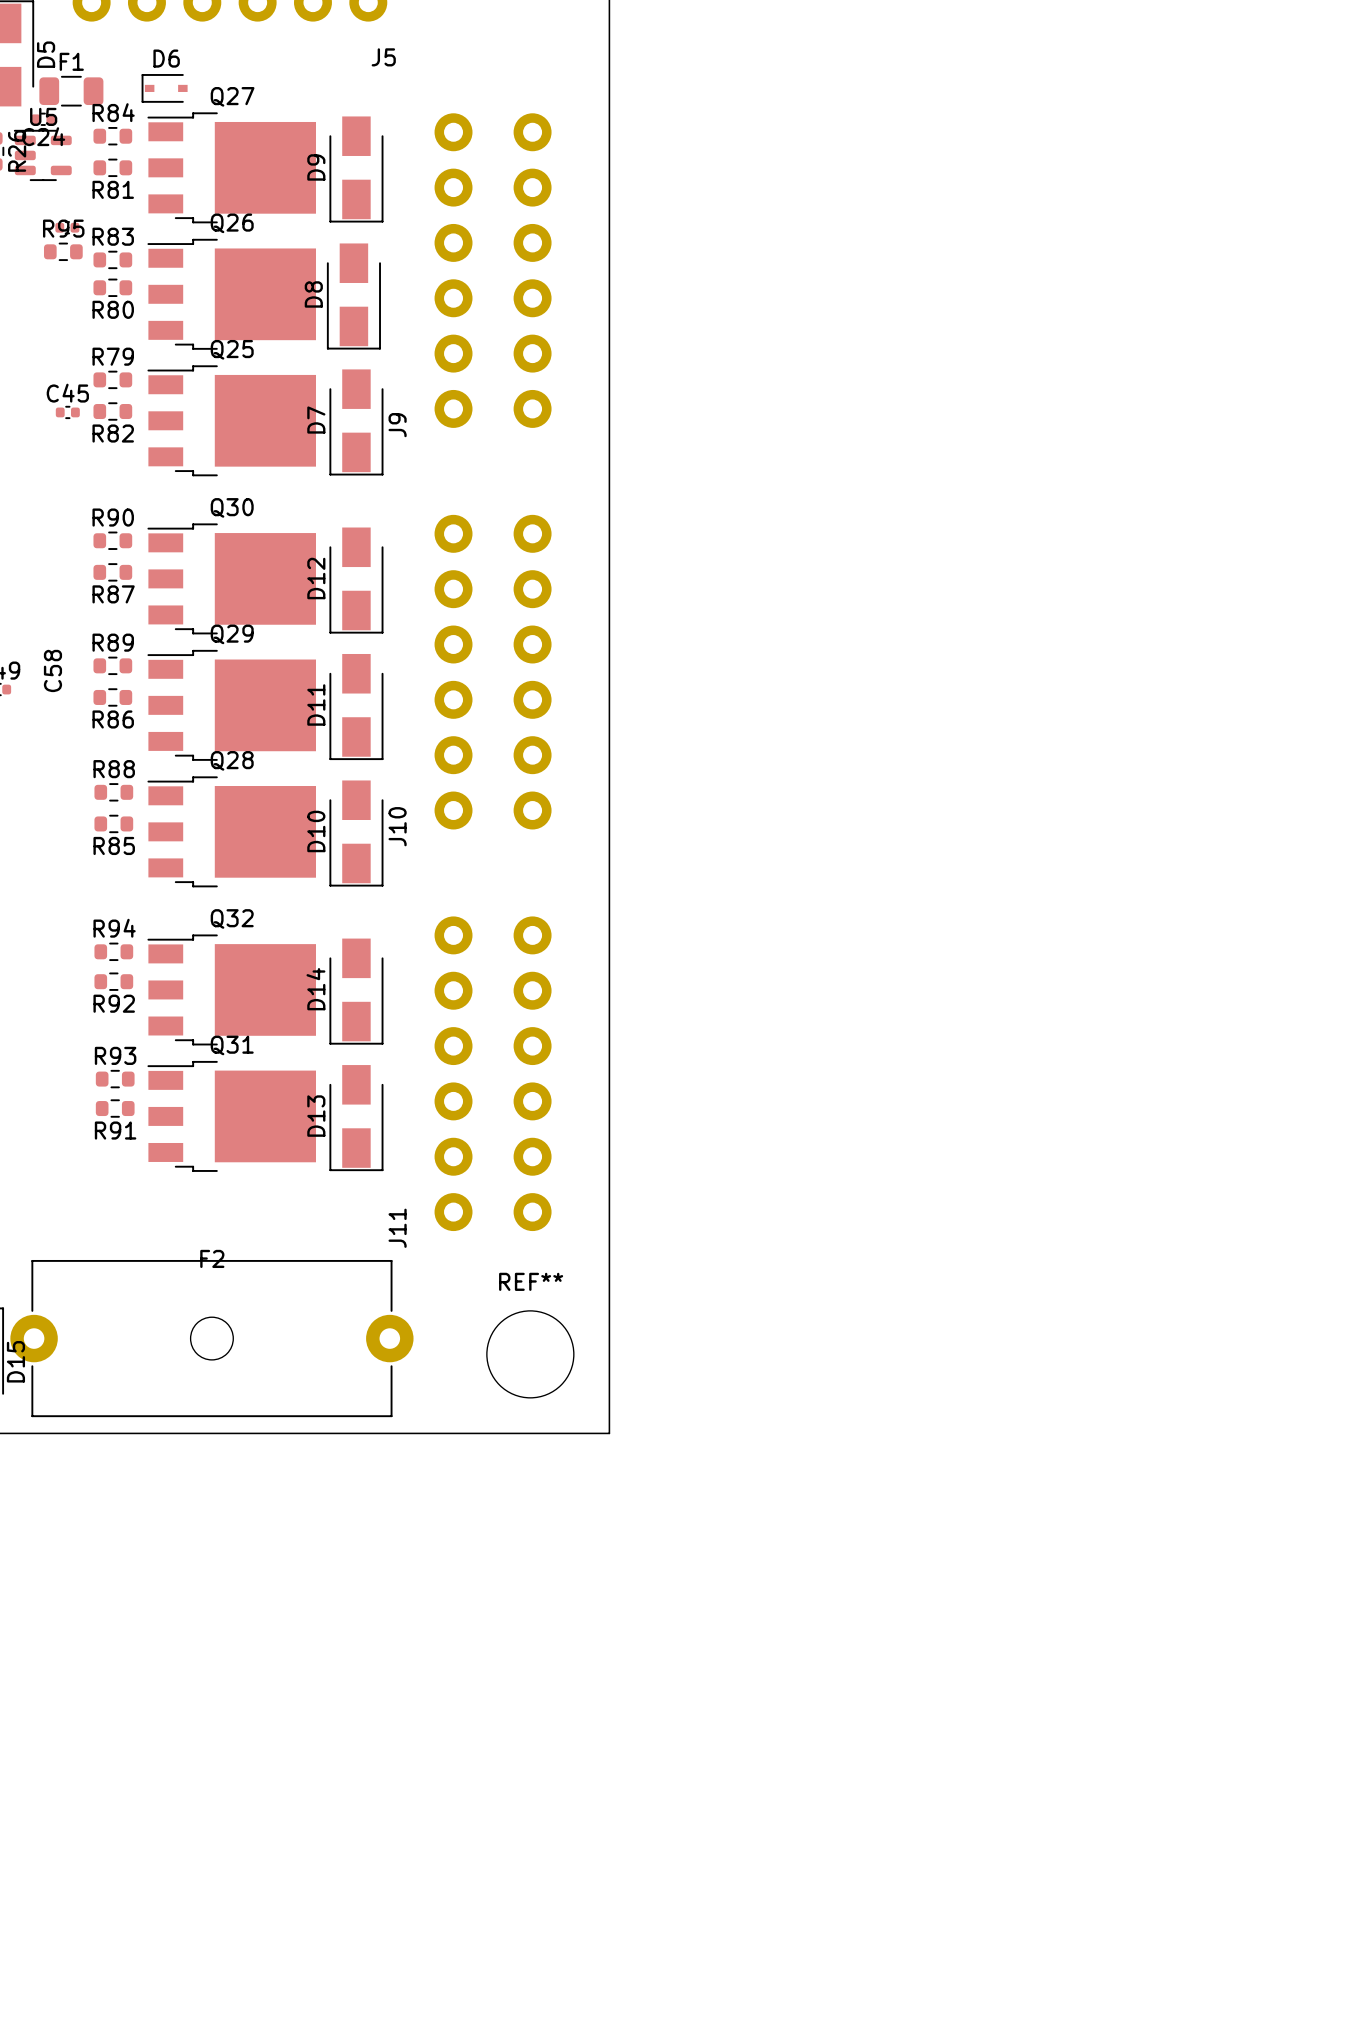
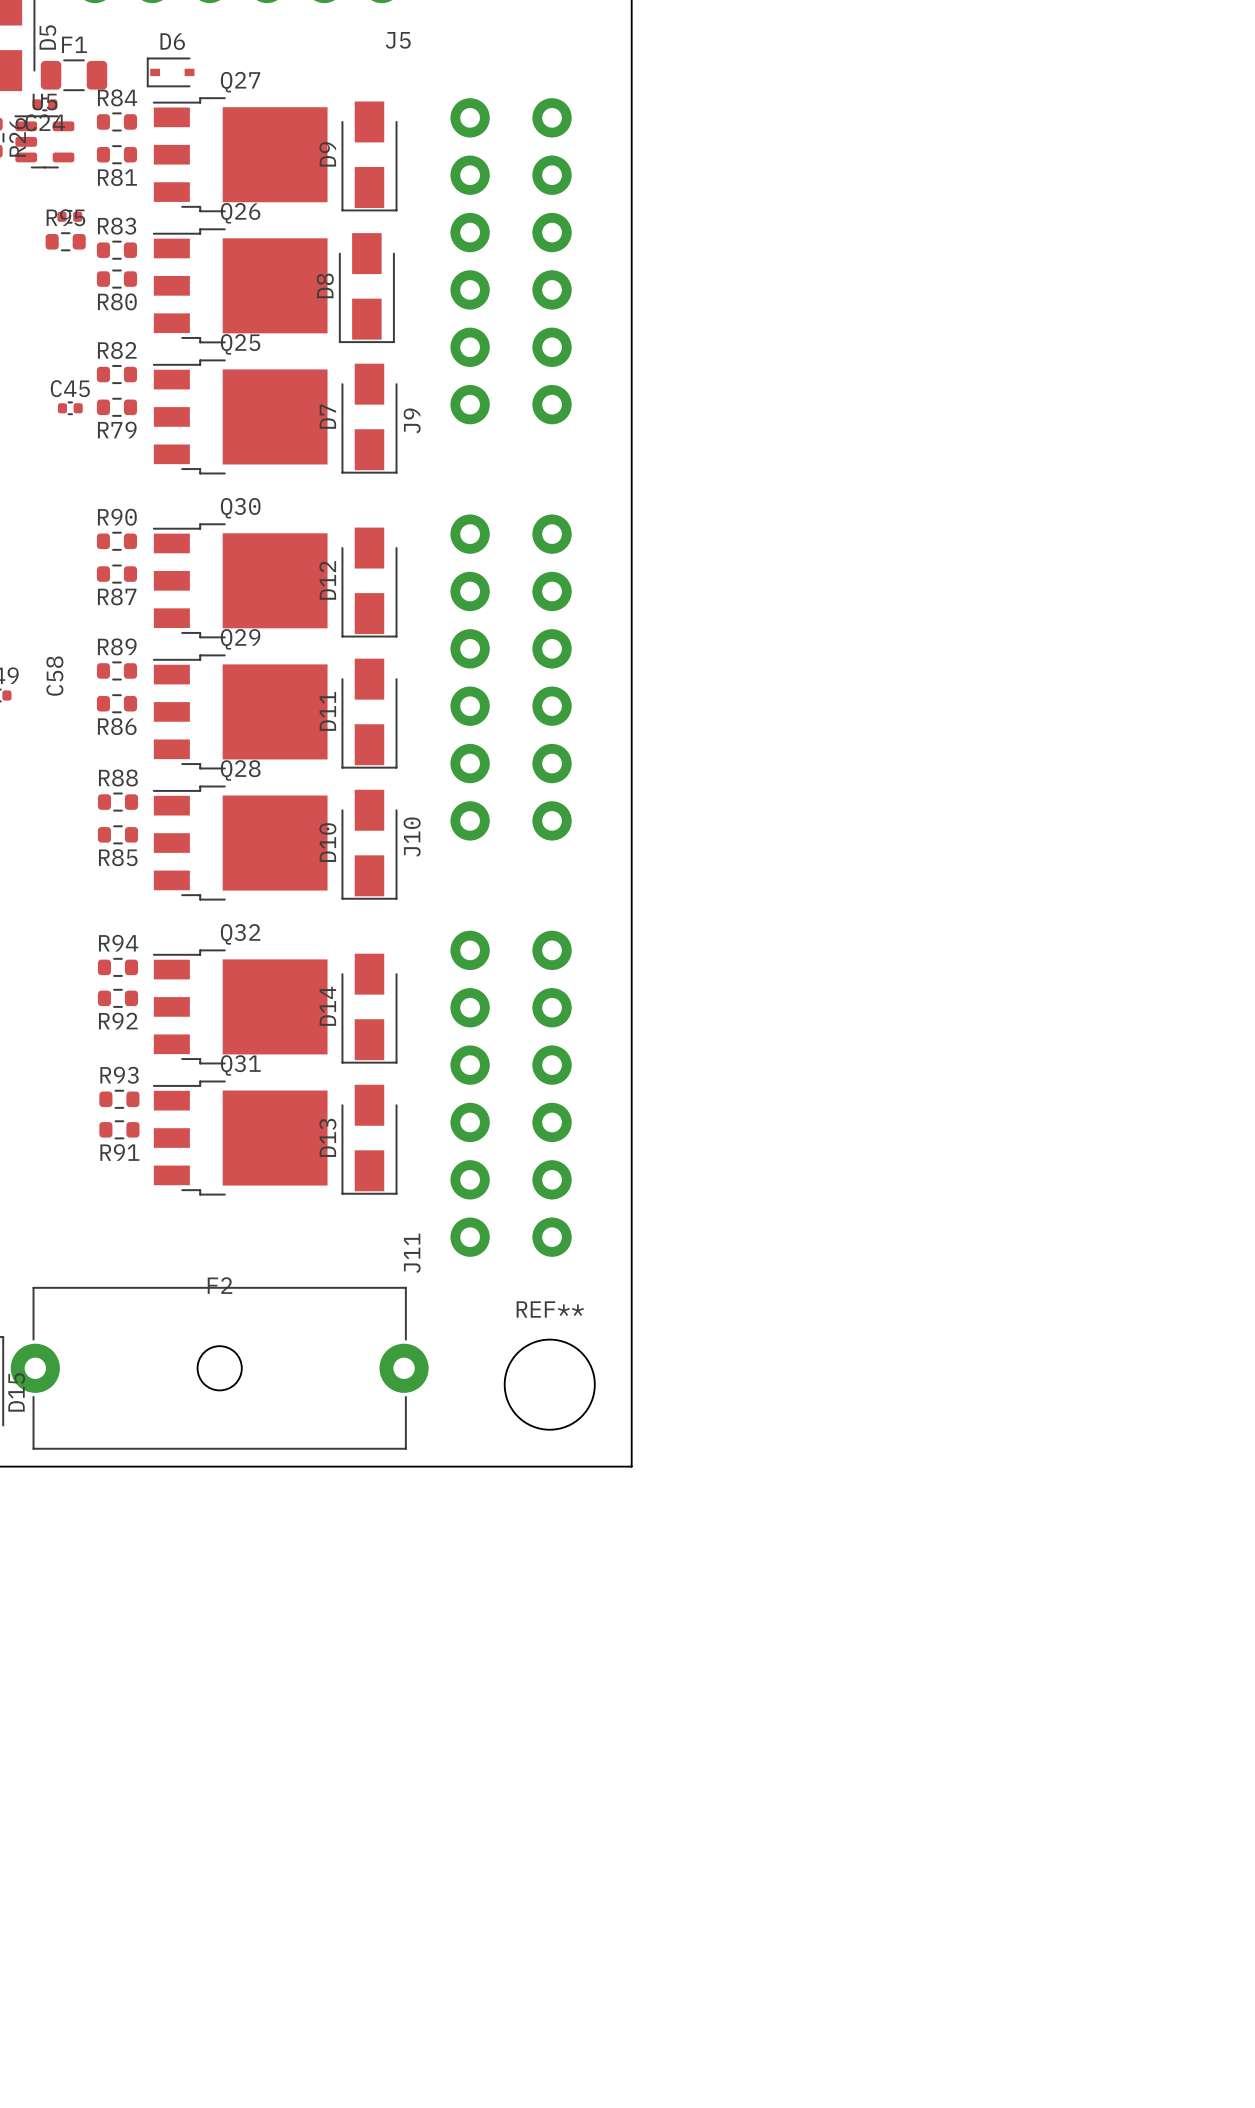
R79 name: R79 (113, 356) -> R82 (117, 350)
R82 name: R82 (113, 433) -> R79 (117, 429)

